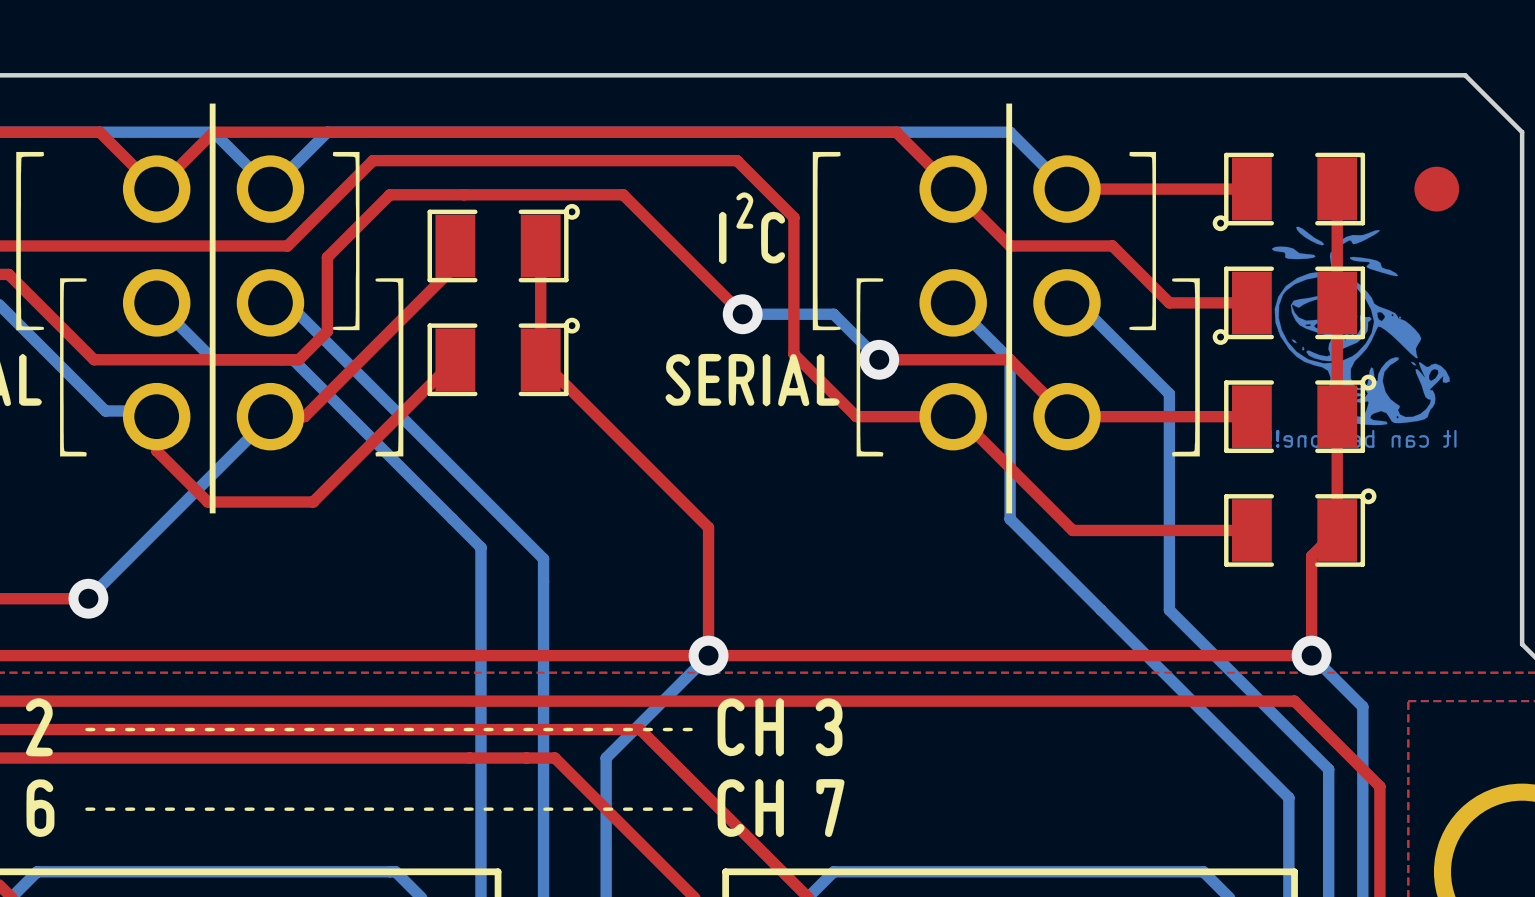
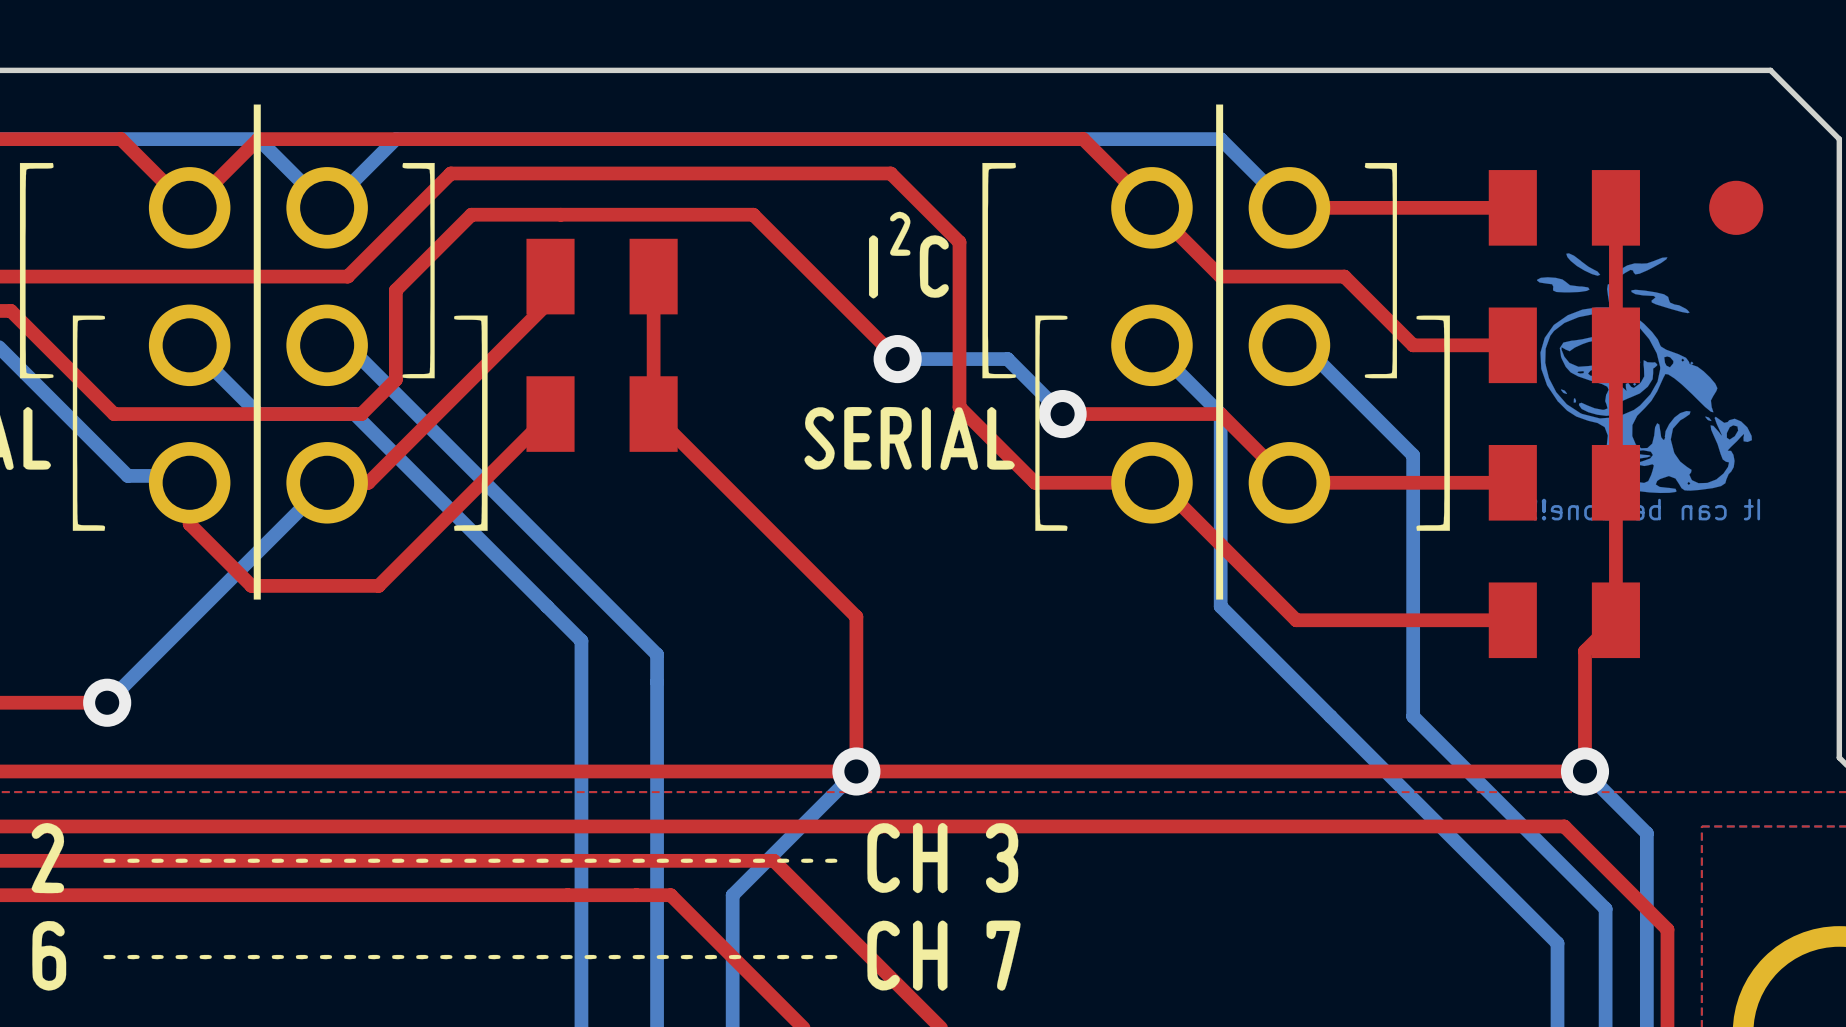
part footprint: [1212, 152, 1366, 232] -> [1488, 170, 1640, 246]
part footprint: [427, 203, 580, 283] -> [526, 238, 678, 315]
part footprint: [1212, 266, 1366, 345] -> [1488, 307, 1640, 384]
part footprint: [427, 317, 580, 397] -> [526, 376, 678, 452]
part footprint: [1224, 374, 1377, 454] -> [1488, 444, 1640, 521]
part footprint: [1224, 488, 1377, 567] -> [1488, 582, 1640, 659]

